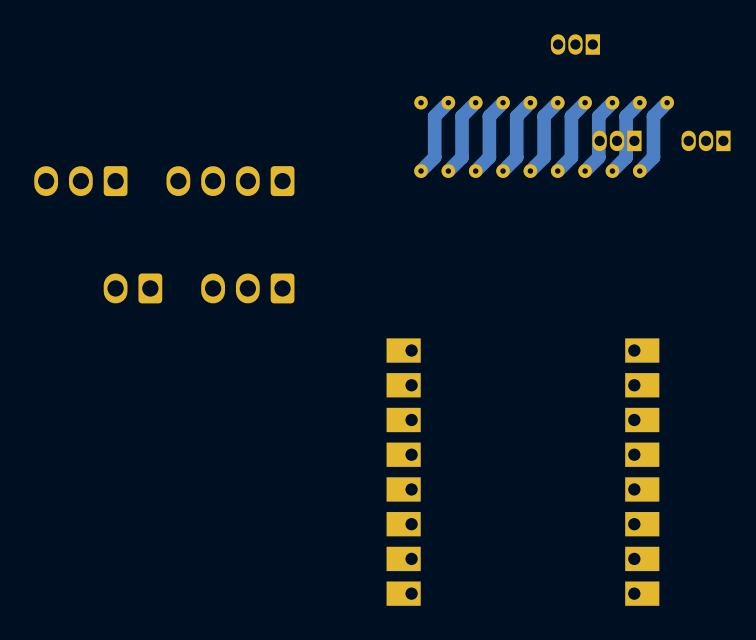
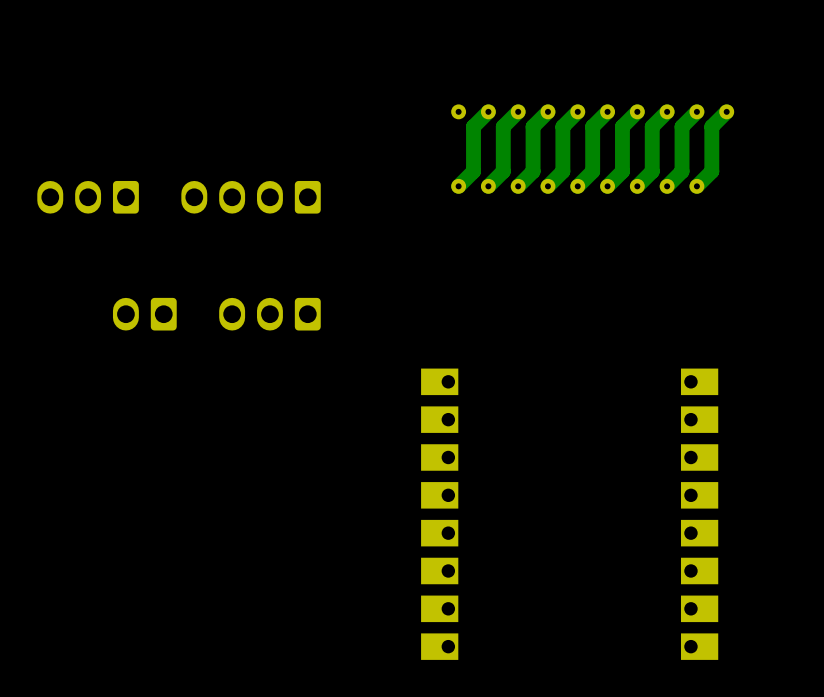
part: (575, 44) -> none
part: (617, 140) -> none
part: (706, 140) -> none

